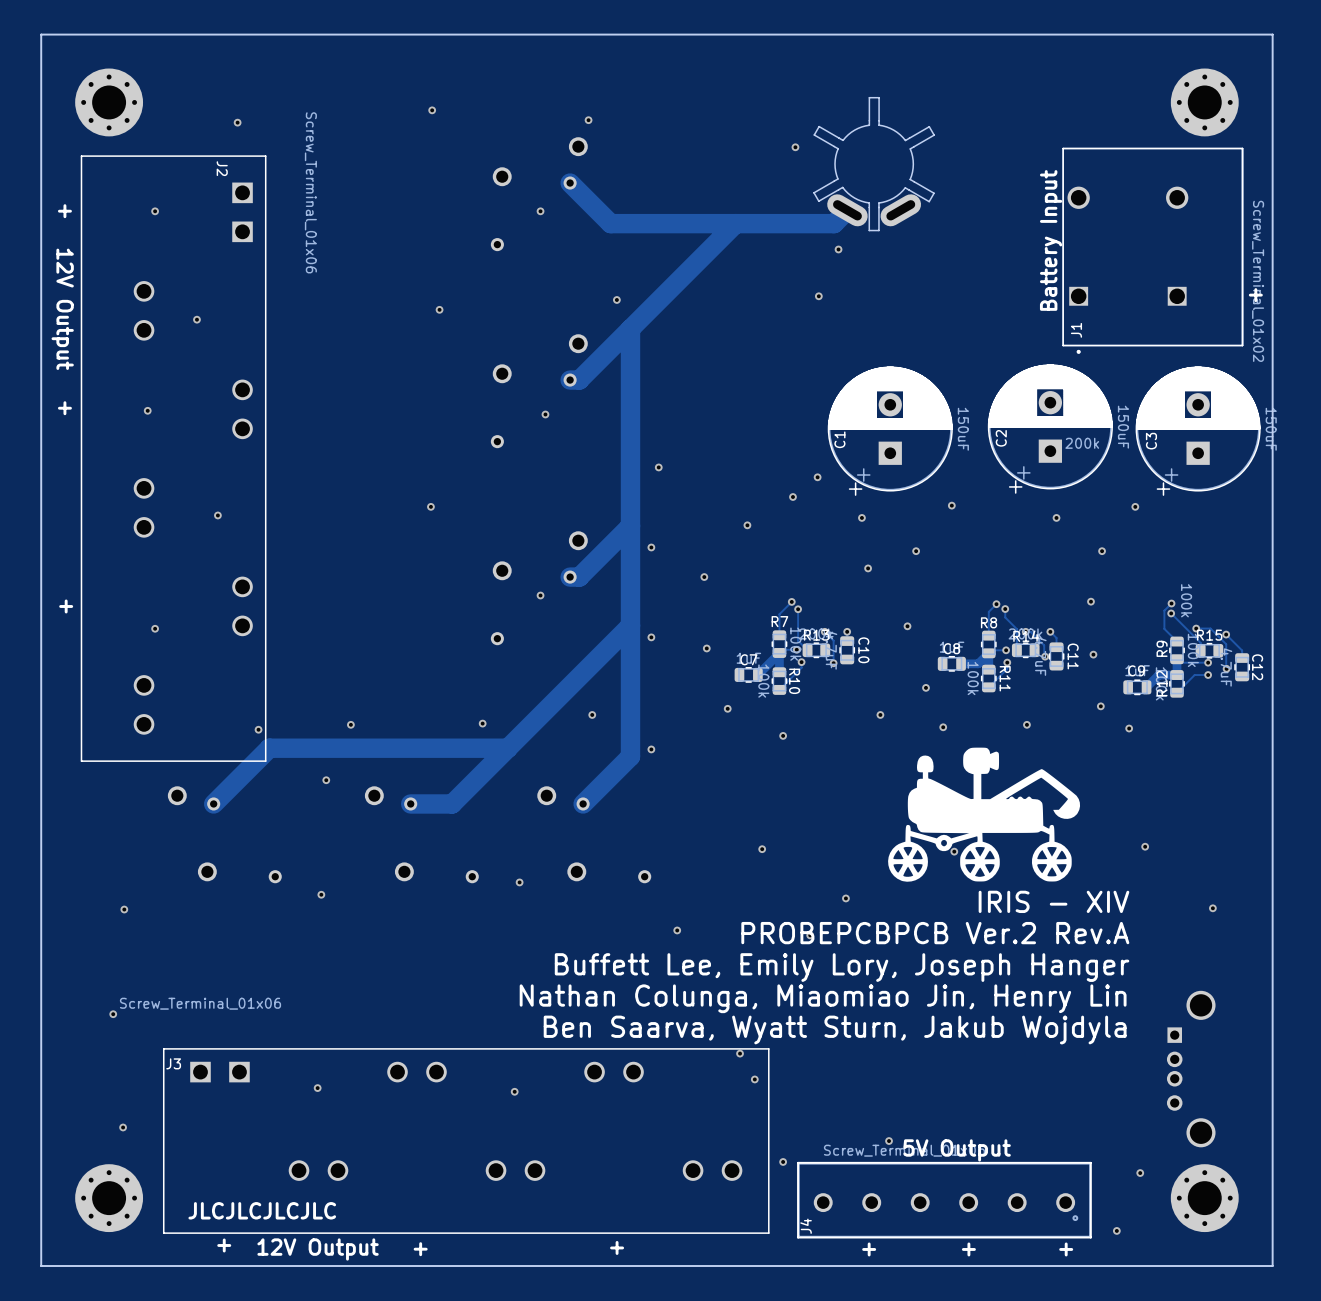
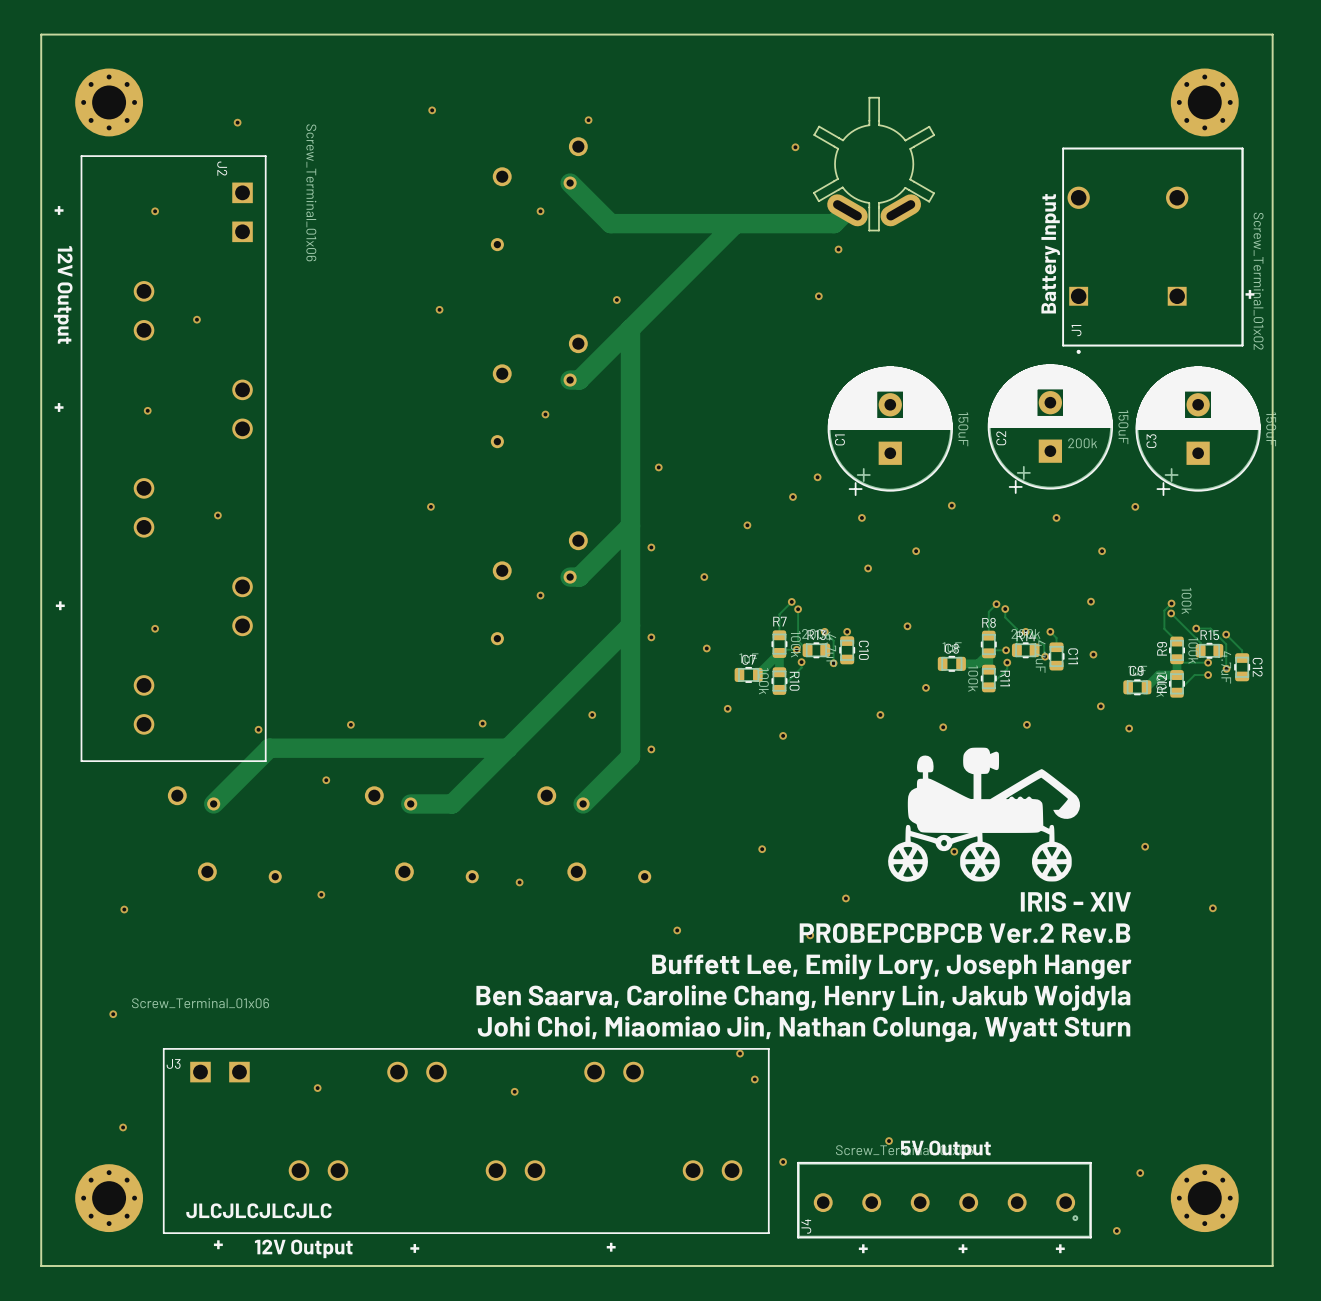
text: PROBEPCBPCB Ver.2 Rev.A (935, 933) -> PROBEPCBPCB Ver.2 Rev.B (964, 933)
text: Nathan Colunga, Miaomiao Jin, Henry Lin (823, 998) -> Ben Saarva, Caroline Chang, Henry Lin, Jakub Wojdyla (803, 997)
text: Ben Saarva, Wyatt Sturn, Jakub Wojdyla (835, 1029) -> Johi Choi, Miaomiao Jin, Nathan Colunga, Wyatt Sturn (804, 1029)
part: (1191, 1069) -> none

